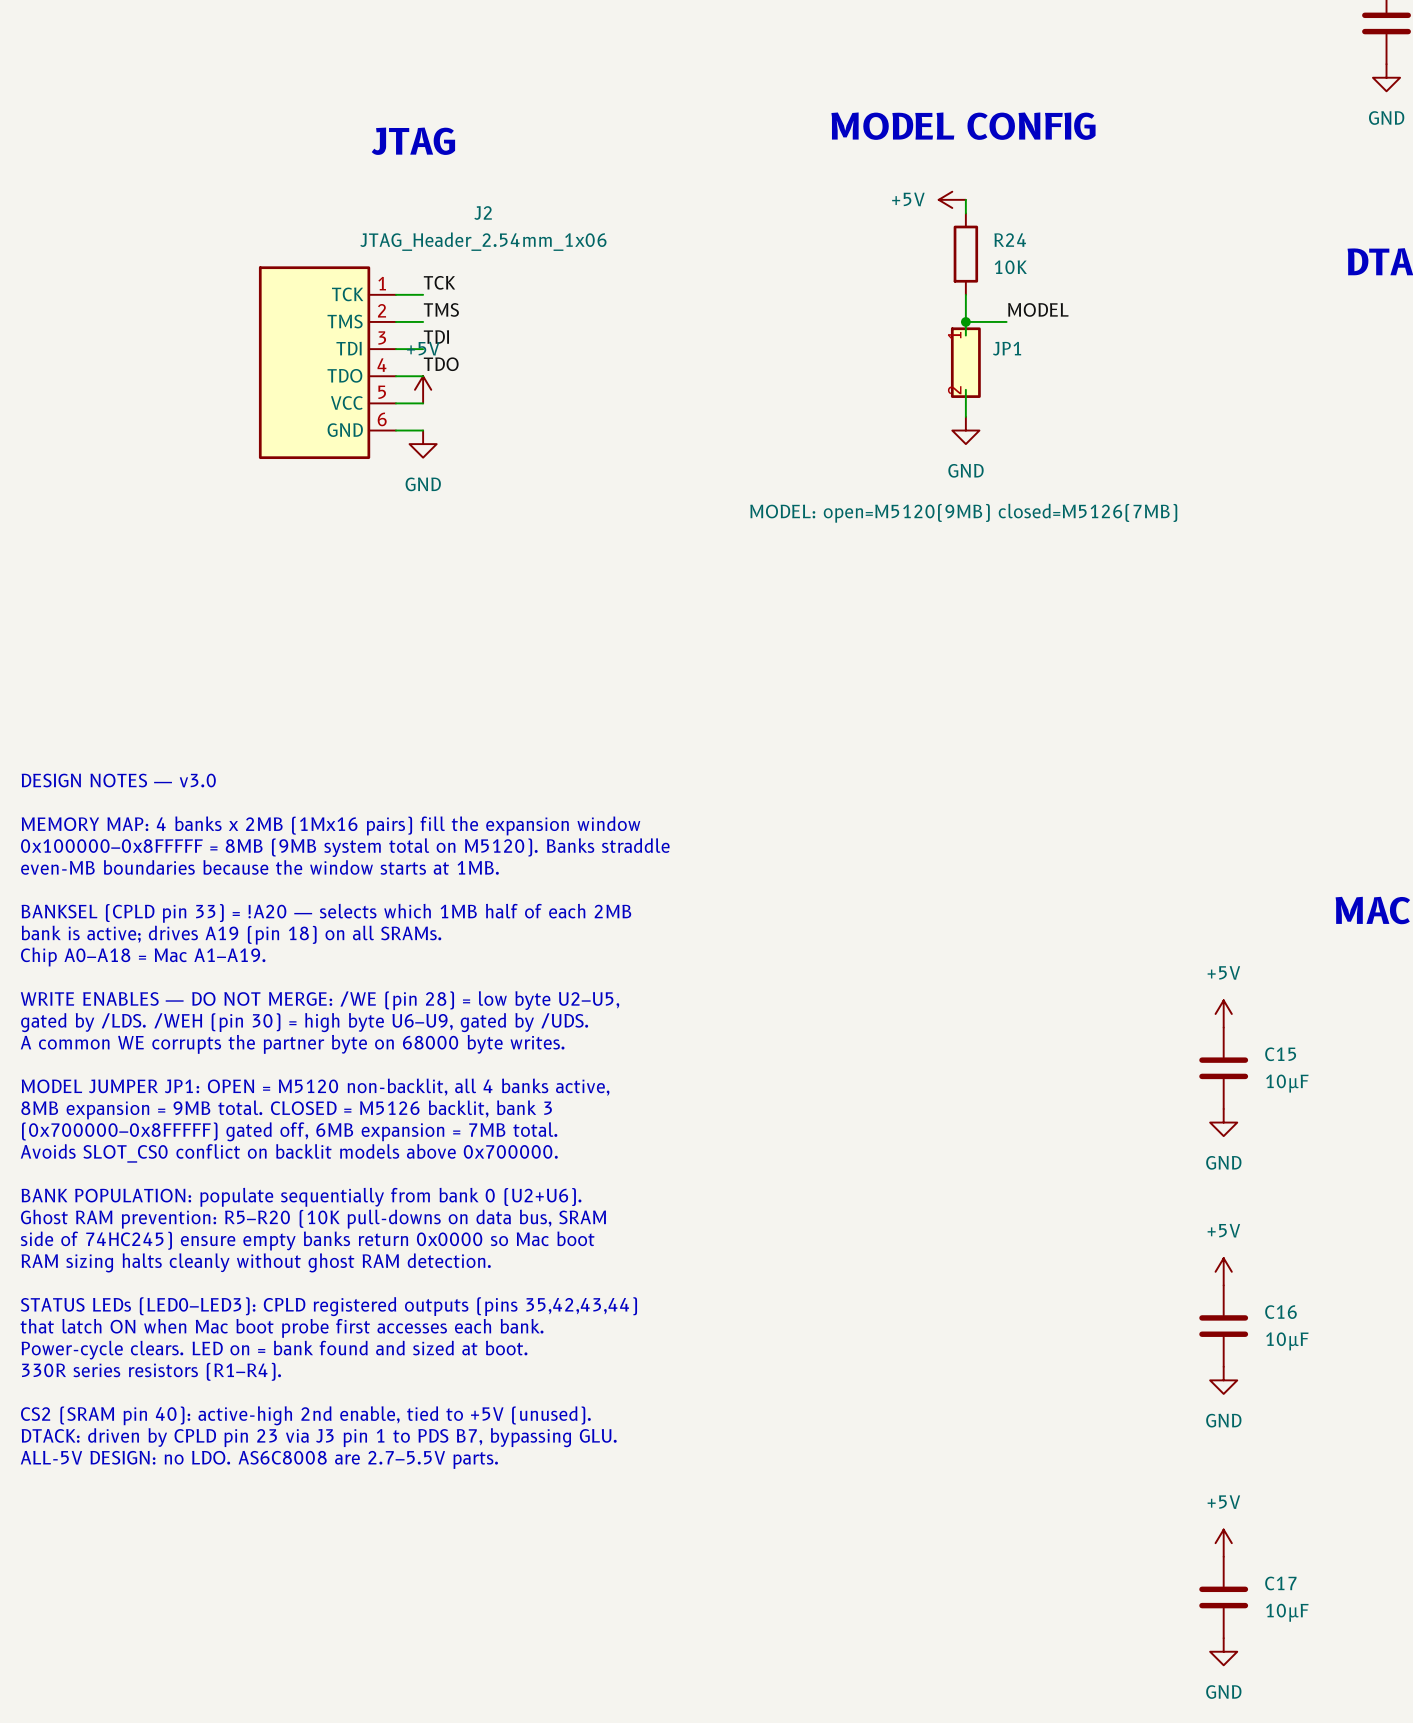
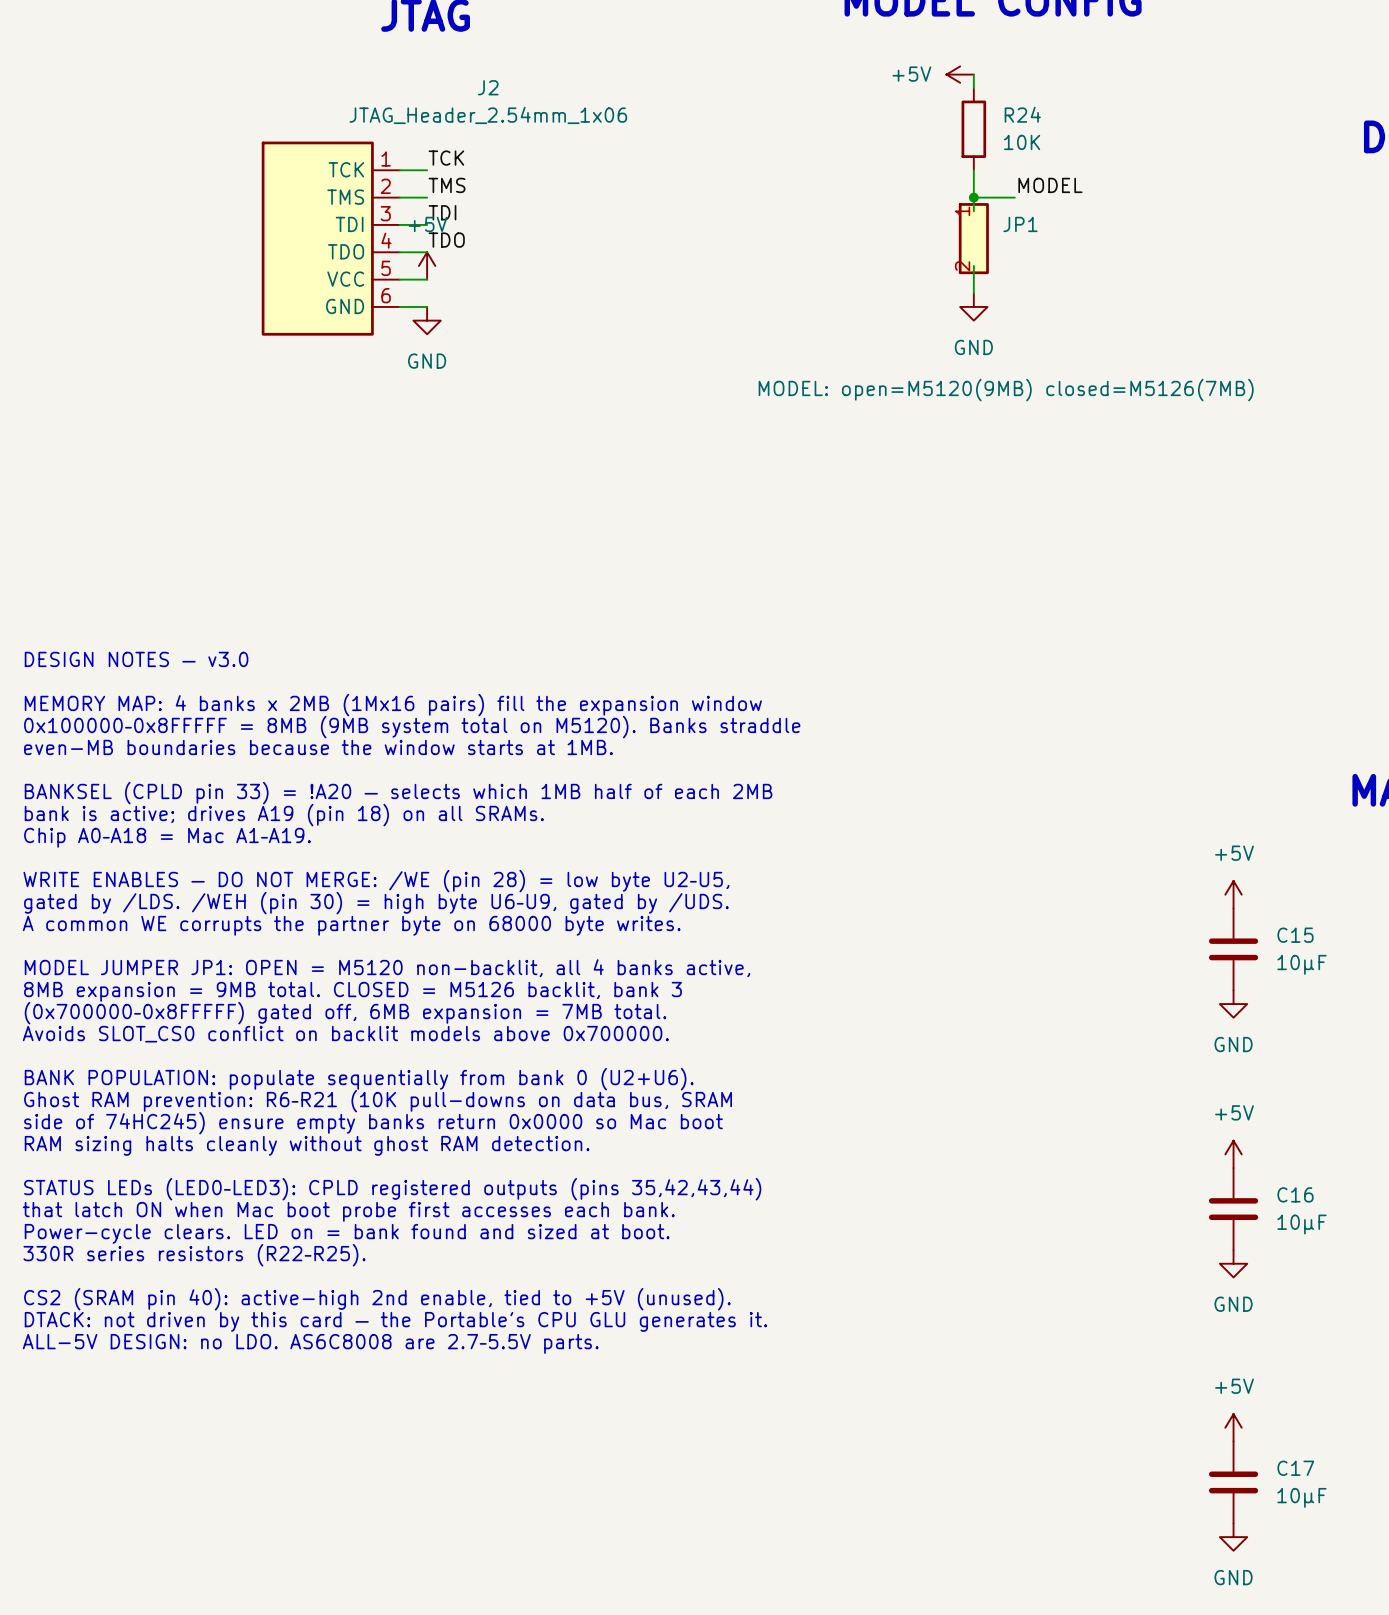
text: Ghost RAM prevention: R5–R20 (10K pull-downs on data bus, SRAM (313, 1219) -> Ghost RAM prevention: R6–R21 (10K pull-downs on data bus, SRAM (378, 1101)
text: 330R series resistors (R1–R4). (151, 1371) -> 330R series resistors (R22–R25). (194, 1255)
text: DTACK: driven by CPLD pin 23 via J3 pin 1 to PDS B7, bypassing GLU. (319, 1437) -> DTACK: not driven by this card — the Portable's CPU GLU generates it. (395, 1321)

